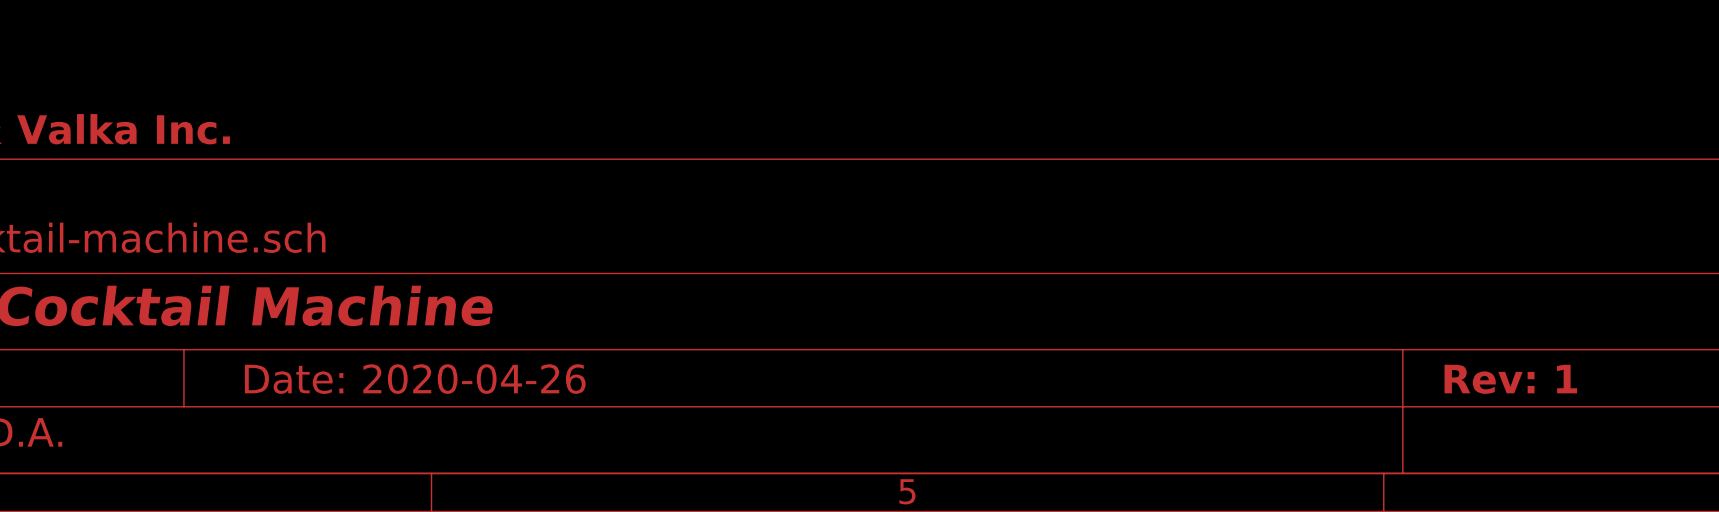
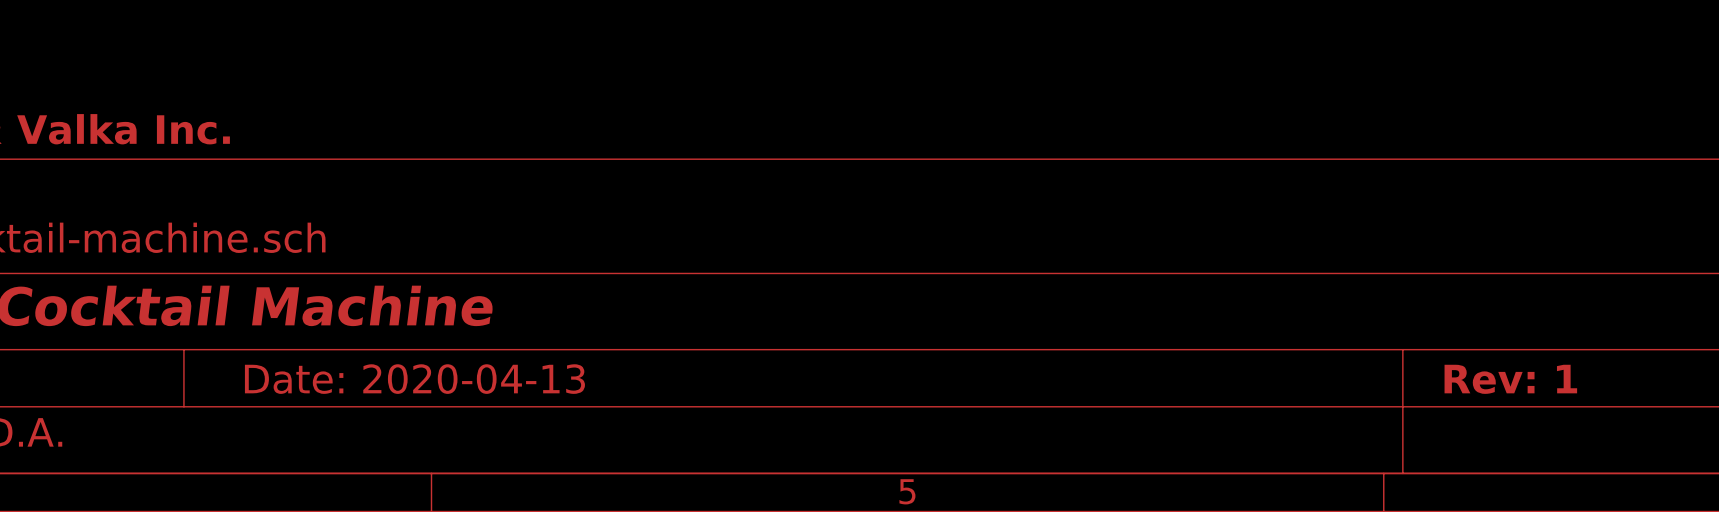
title block: Date: 2020-04-26 (415, 379) -> Date: 2020-04-13 (414, 379)

